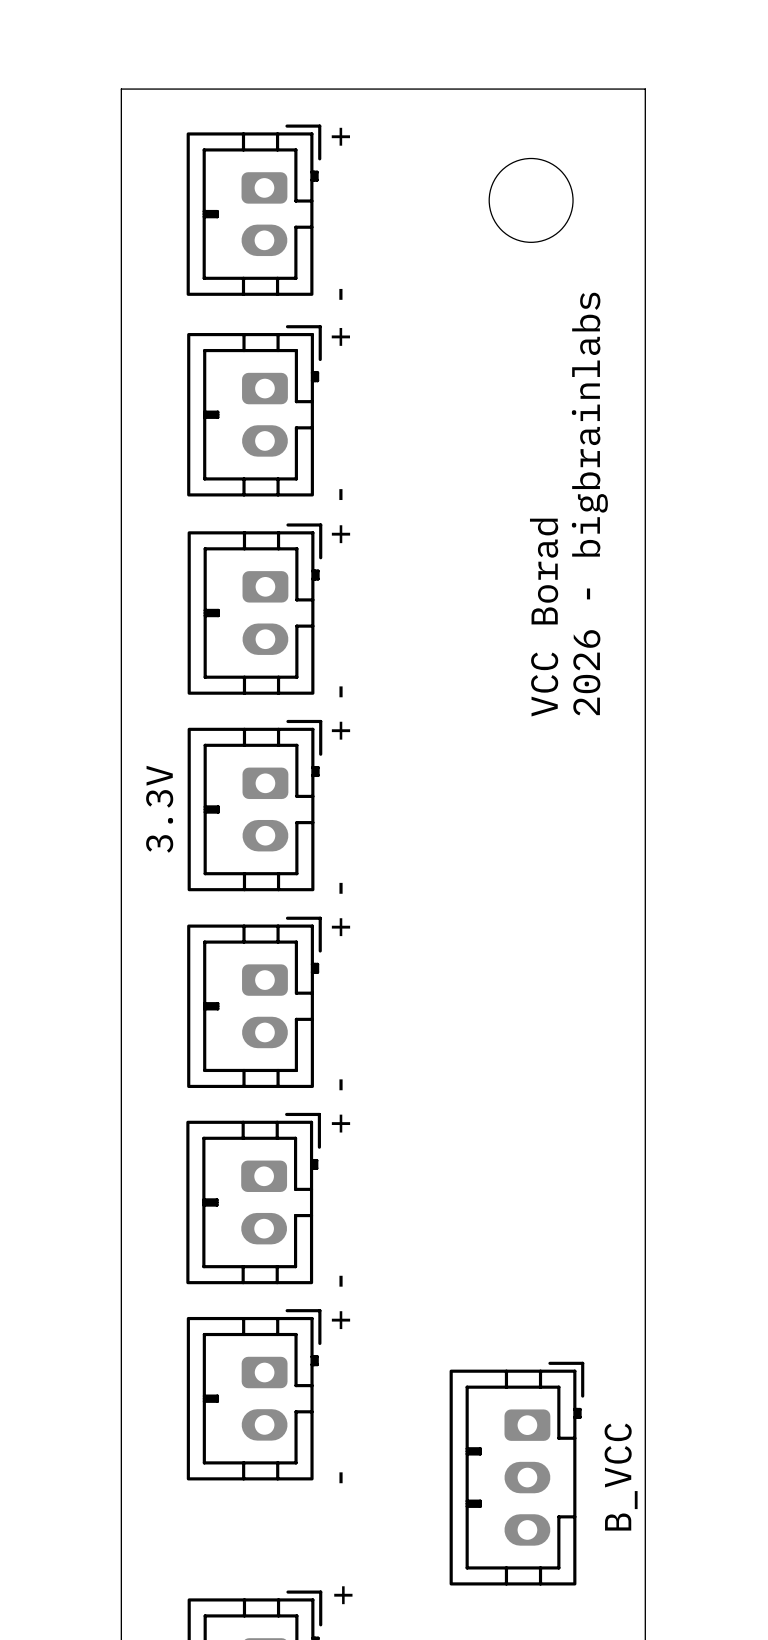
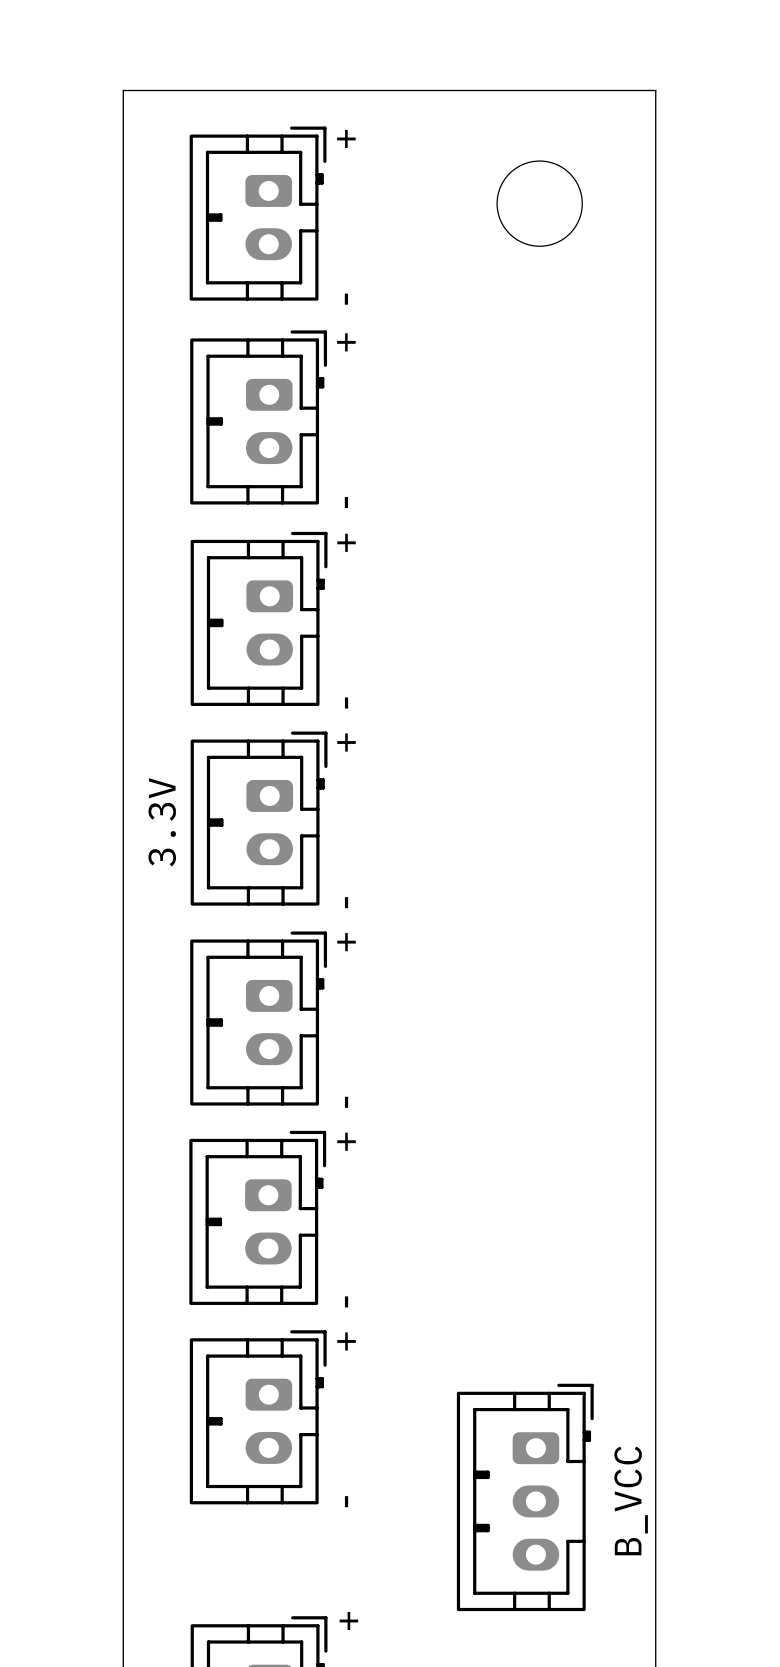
text: 2026 - bigbrainlabs (589, 504) -> none
text: VCC Borad (544, 617) -> none

